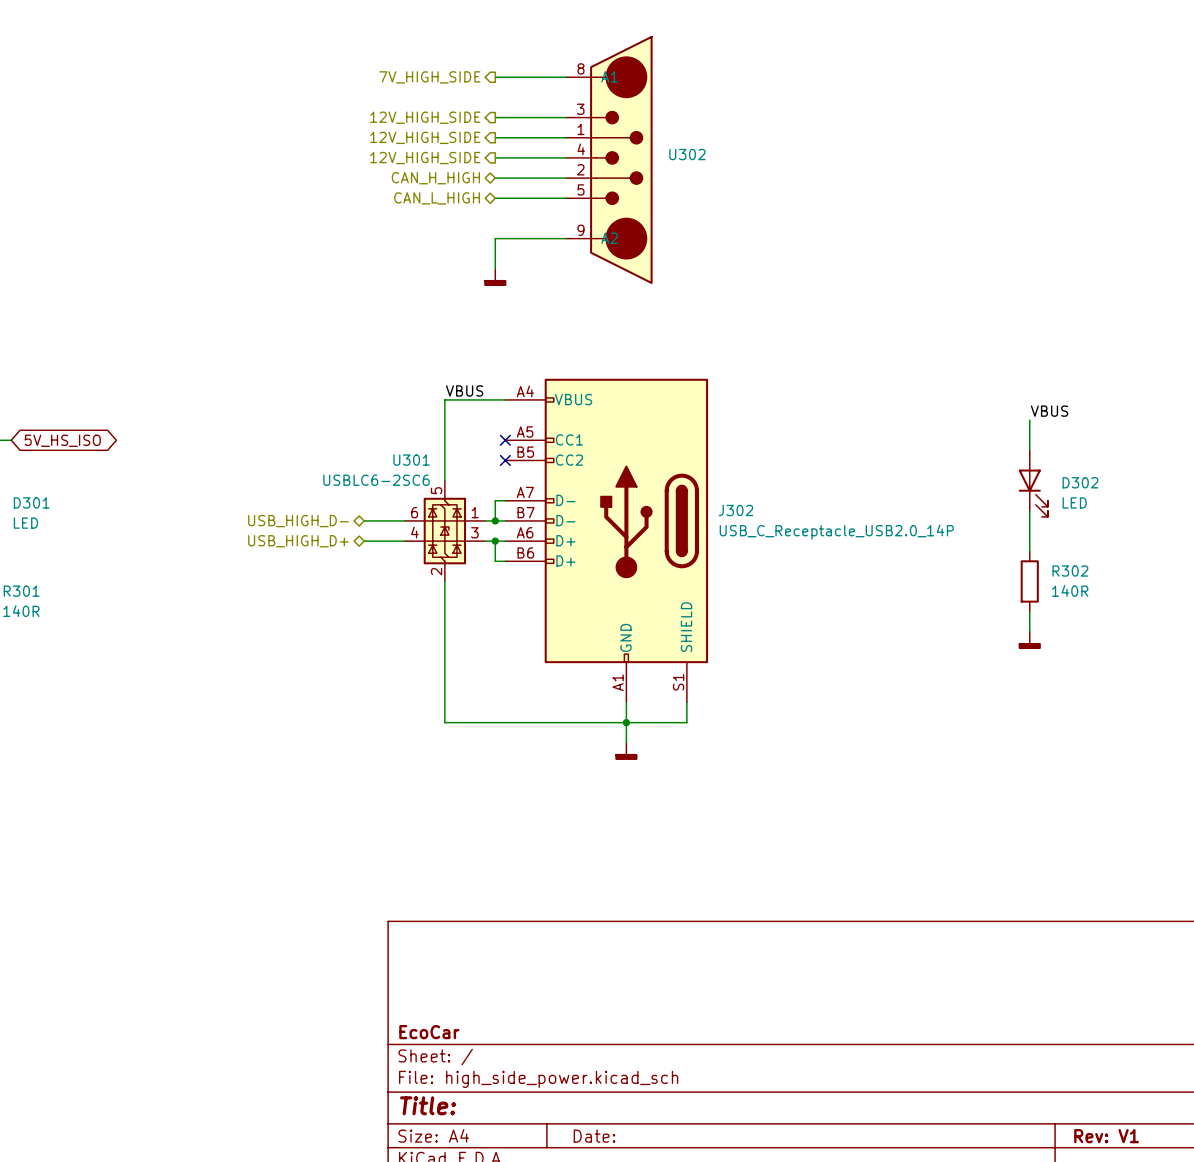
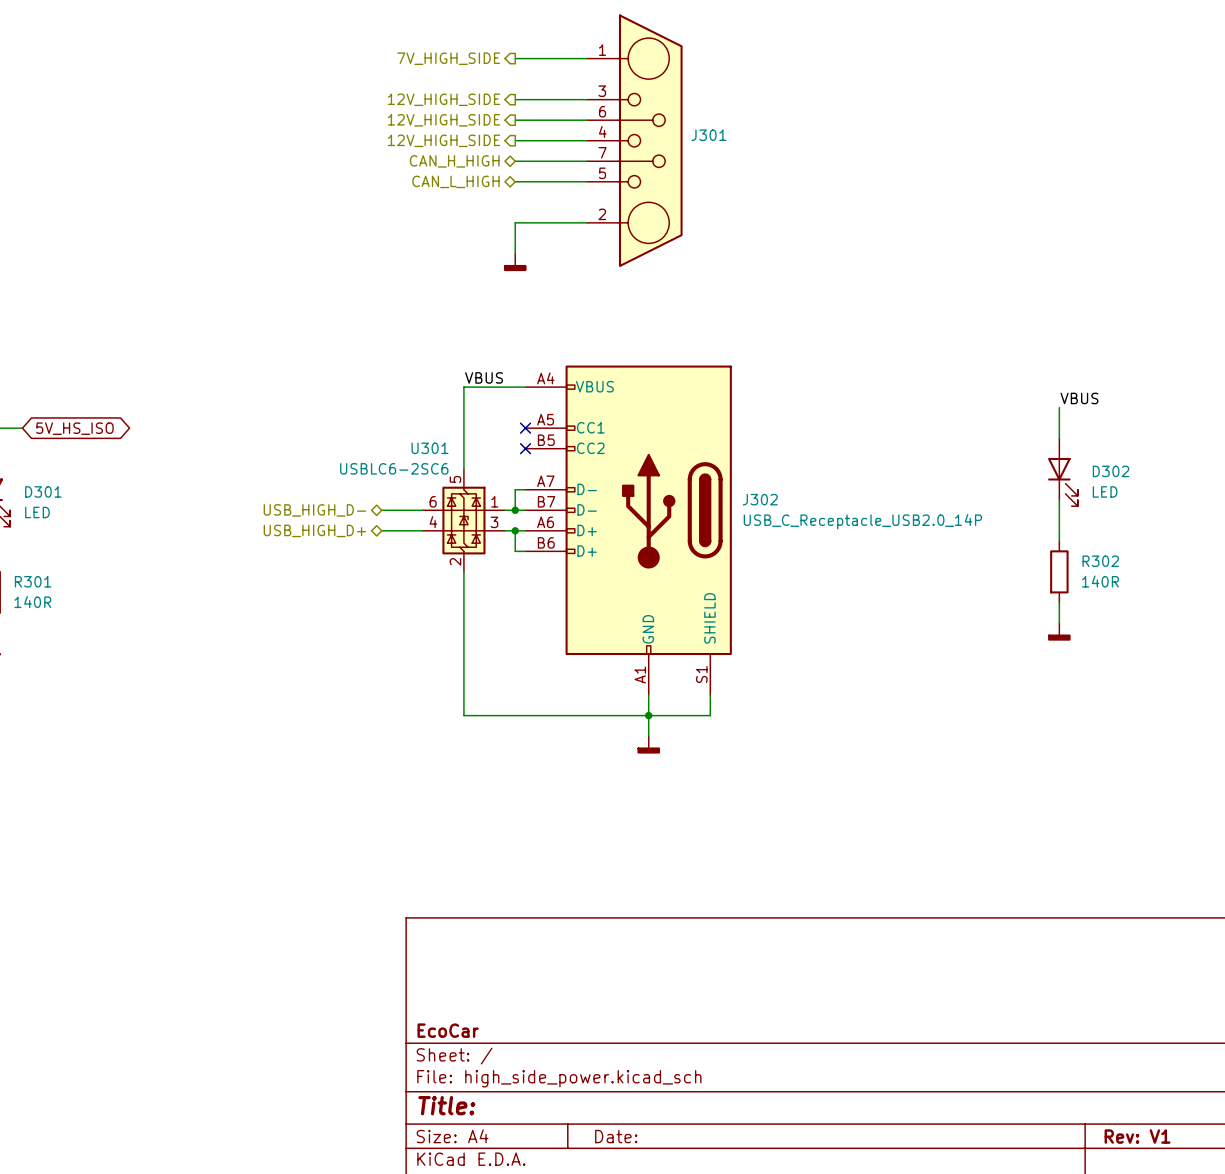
J301: none -> (634, 140)
U302: (609, 159) -> none

